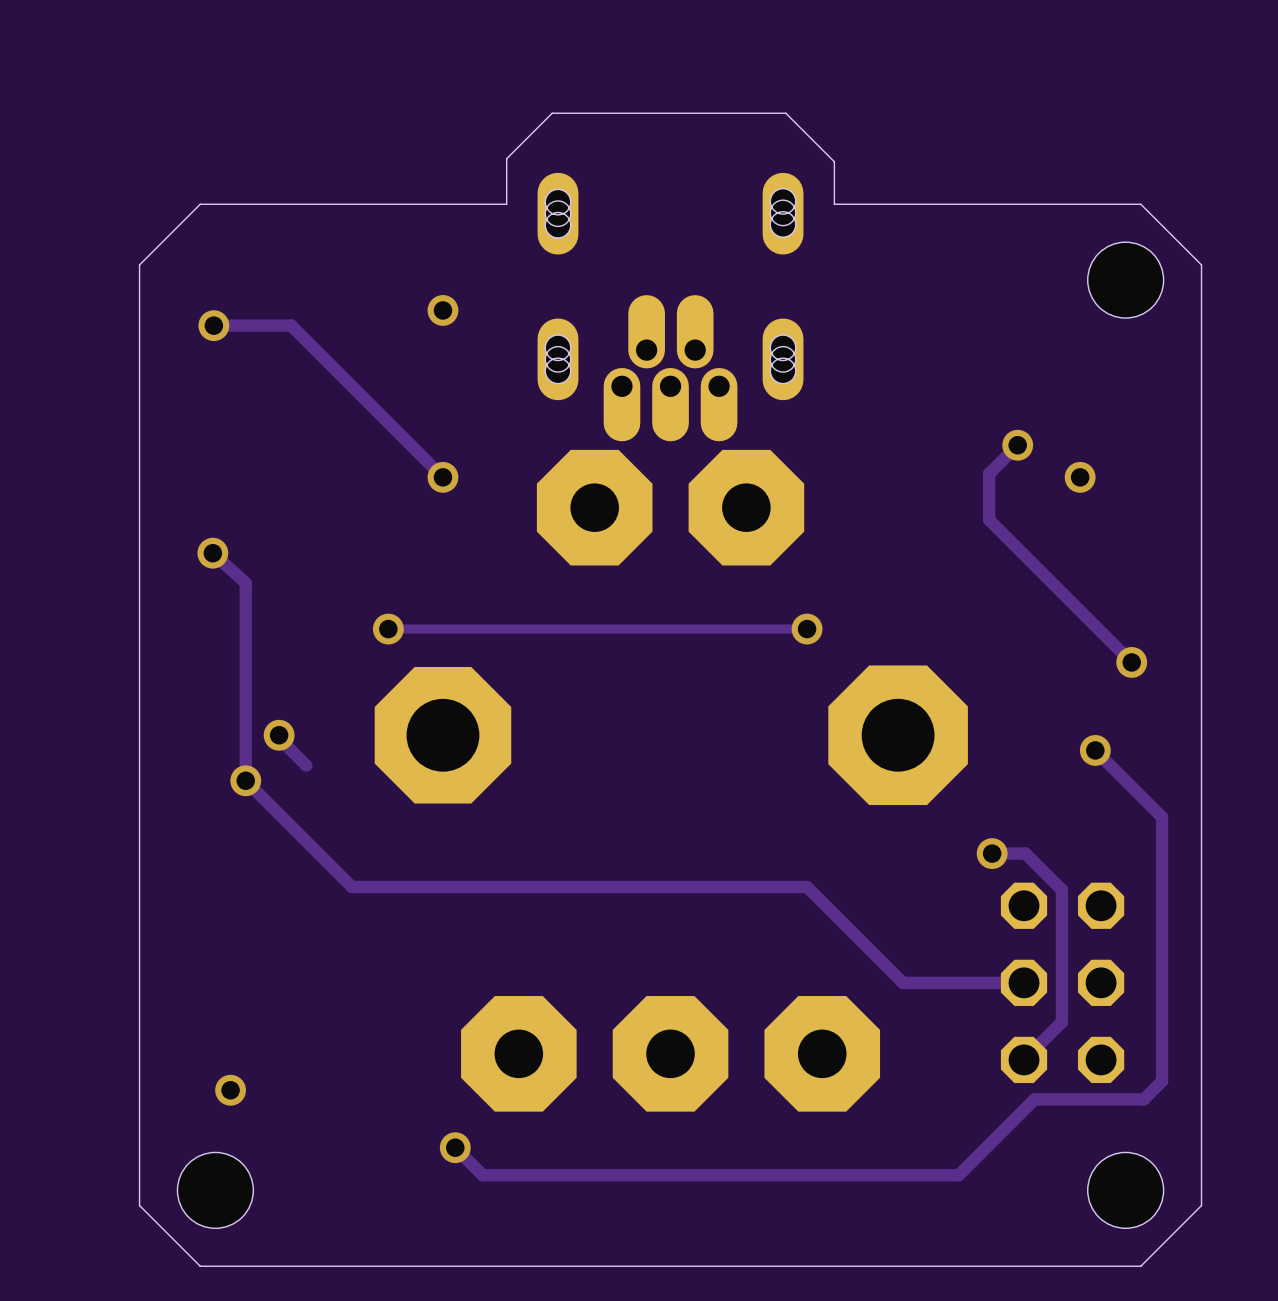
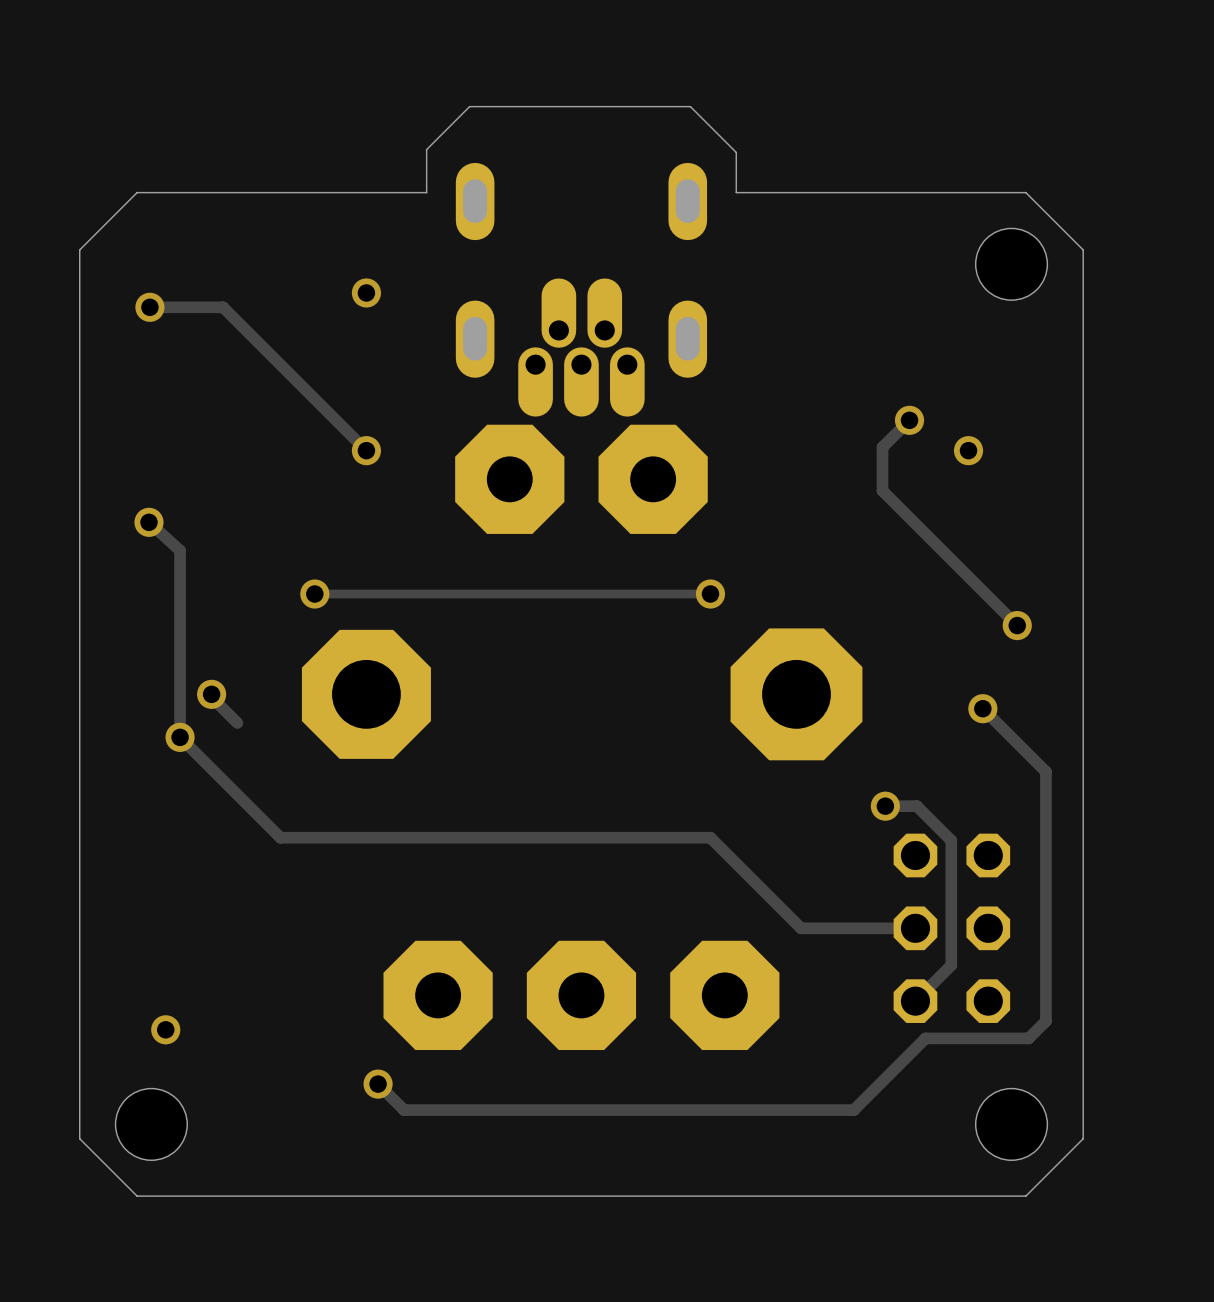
part footprint: [537, 172, 804, 442] -> [455, 162, 708, 417]

